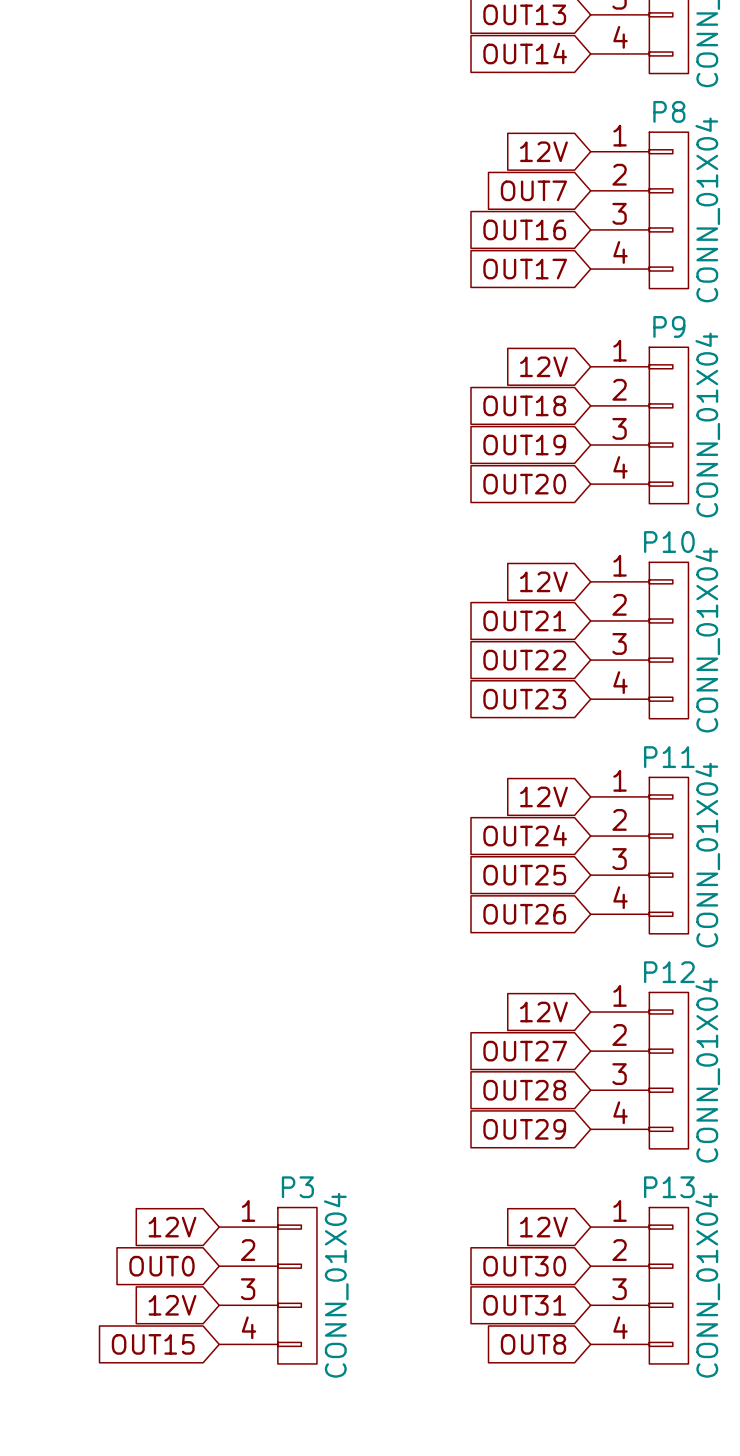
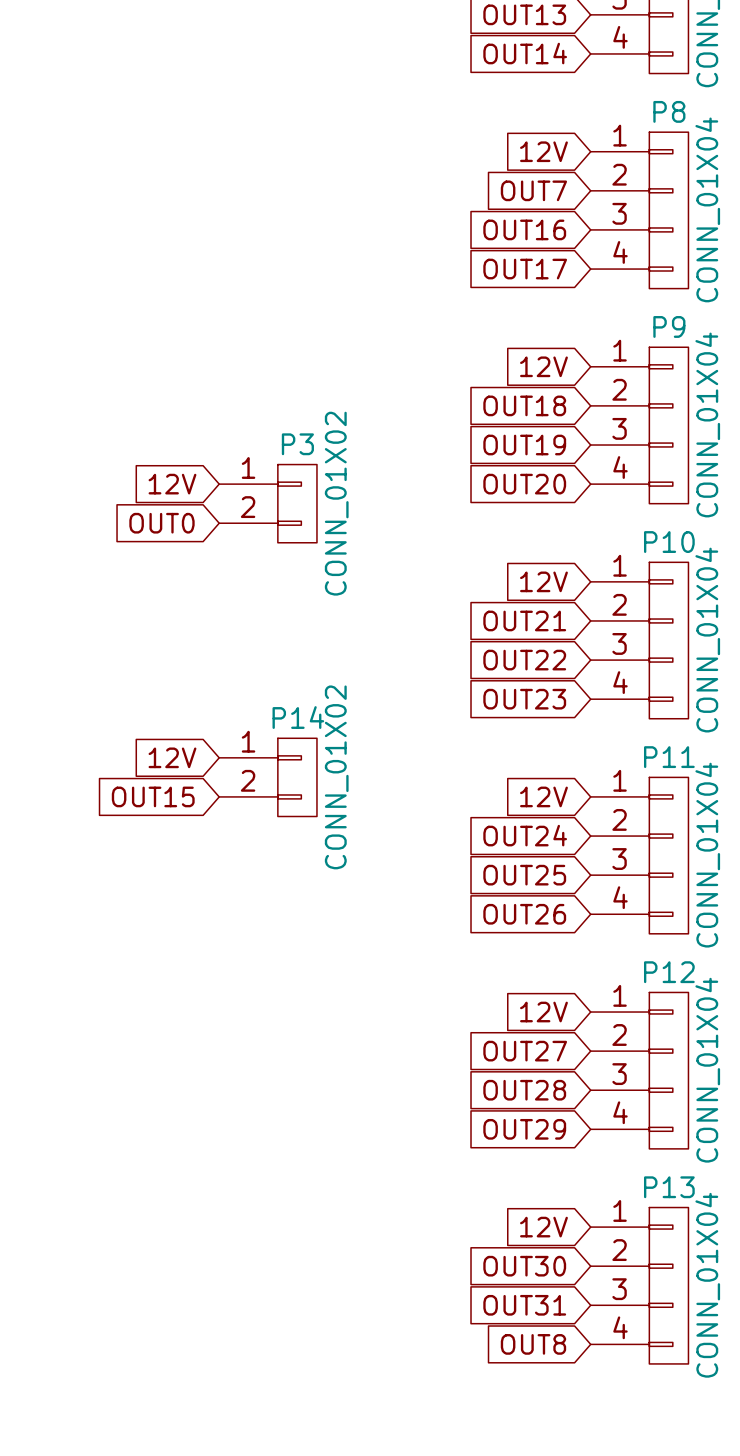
global label: none -> 12V (172, 484)
global label: none -> OUT0 (161, 523)
global label: none -> 12V (172, 757)
P14: none -> CONN_01X02 (268, 777)
global label: none -> OUT15 (153, 796)
P3 name position: P3 (297, 1187) -> P3 (297, 444)
P3 symbol: [219, 1207, 317, 1364] -> [219, 464, 317, 543]
global label: 12V (172, 1227) -> none
global label: OUT0 (161, 1266) -> none
P3 value: CONN_01X04 (336, 1285) -> CONN_01X02 (336, 503)
global label: 12V (172, 1305) -> none
global label: OUT15 (153, 1344) -> none

